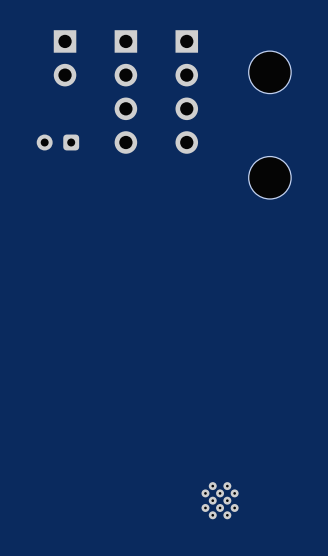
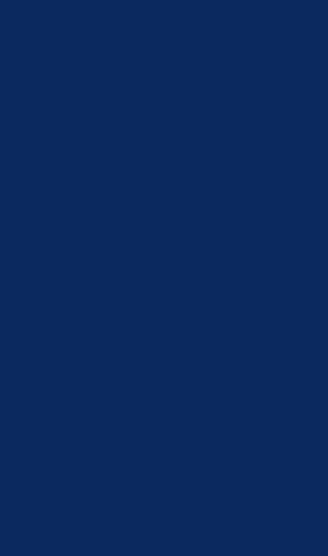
part: (65, 58) -> none
part: (269, 72) -> none
part: (125, 91) -> none
part: (186, 91) -> none
part: (57, 142) -> none
part: (269, 177) -> none
part: (220, 500) -> none

